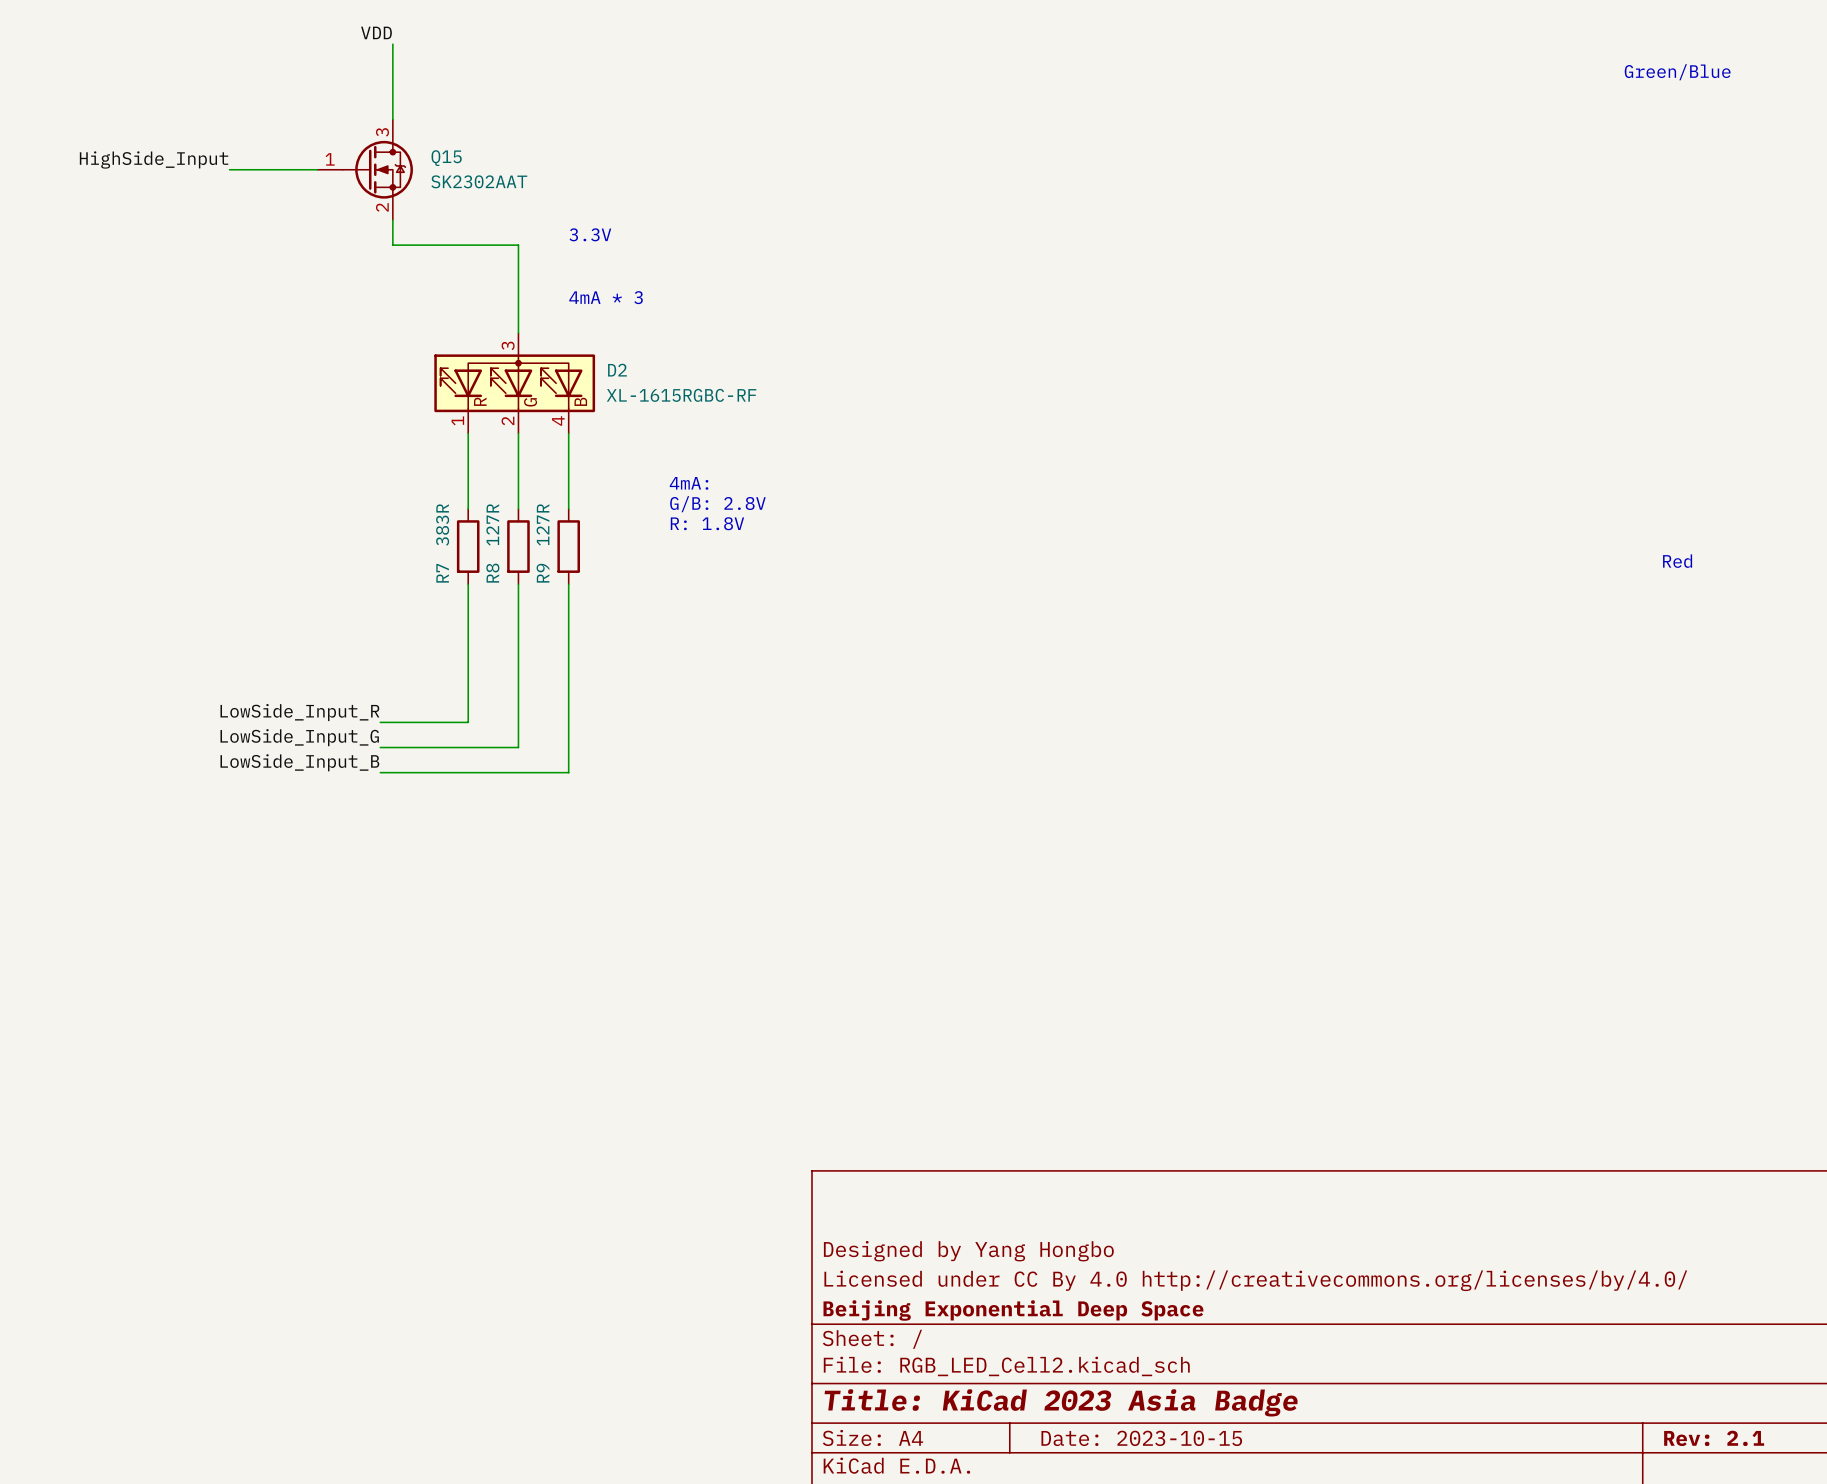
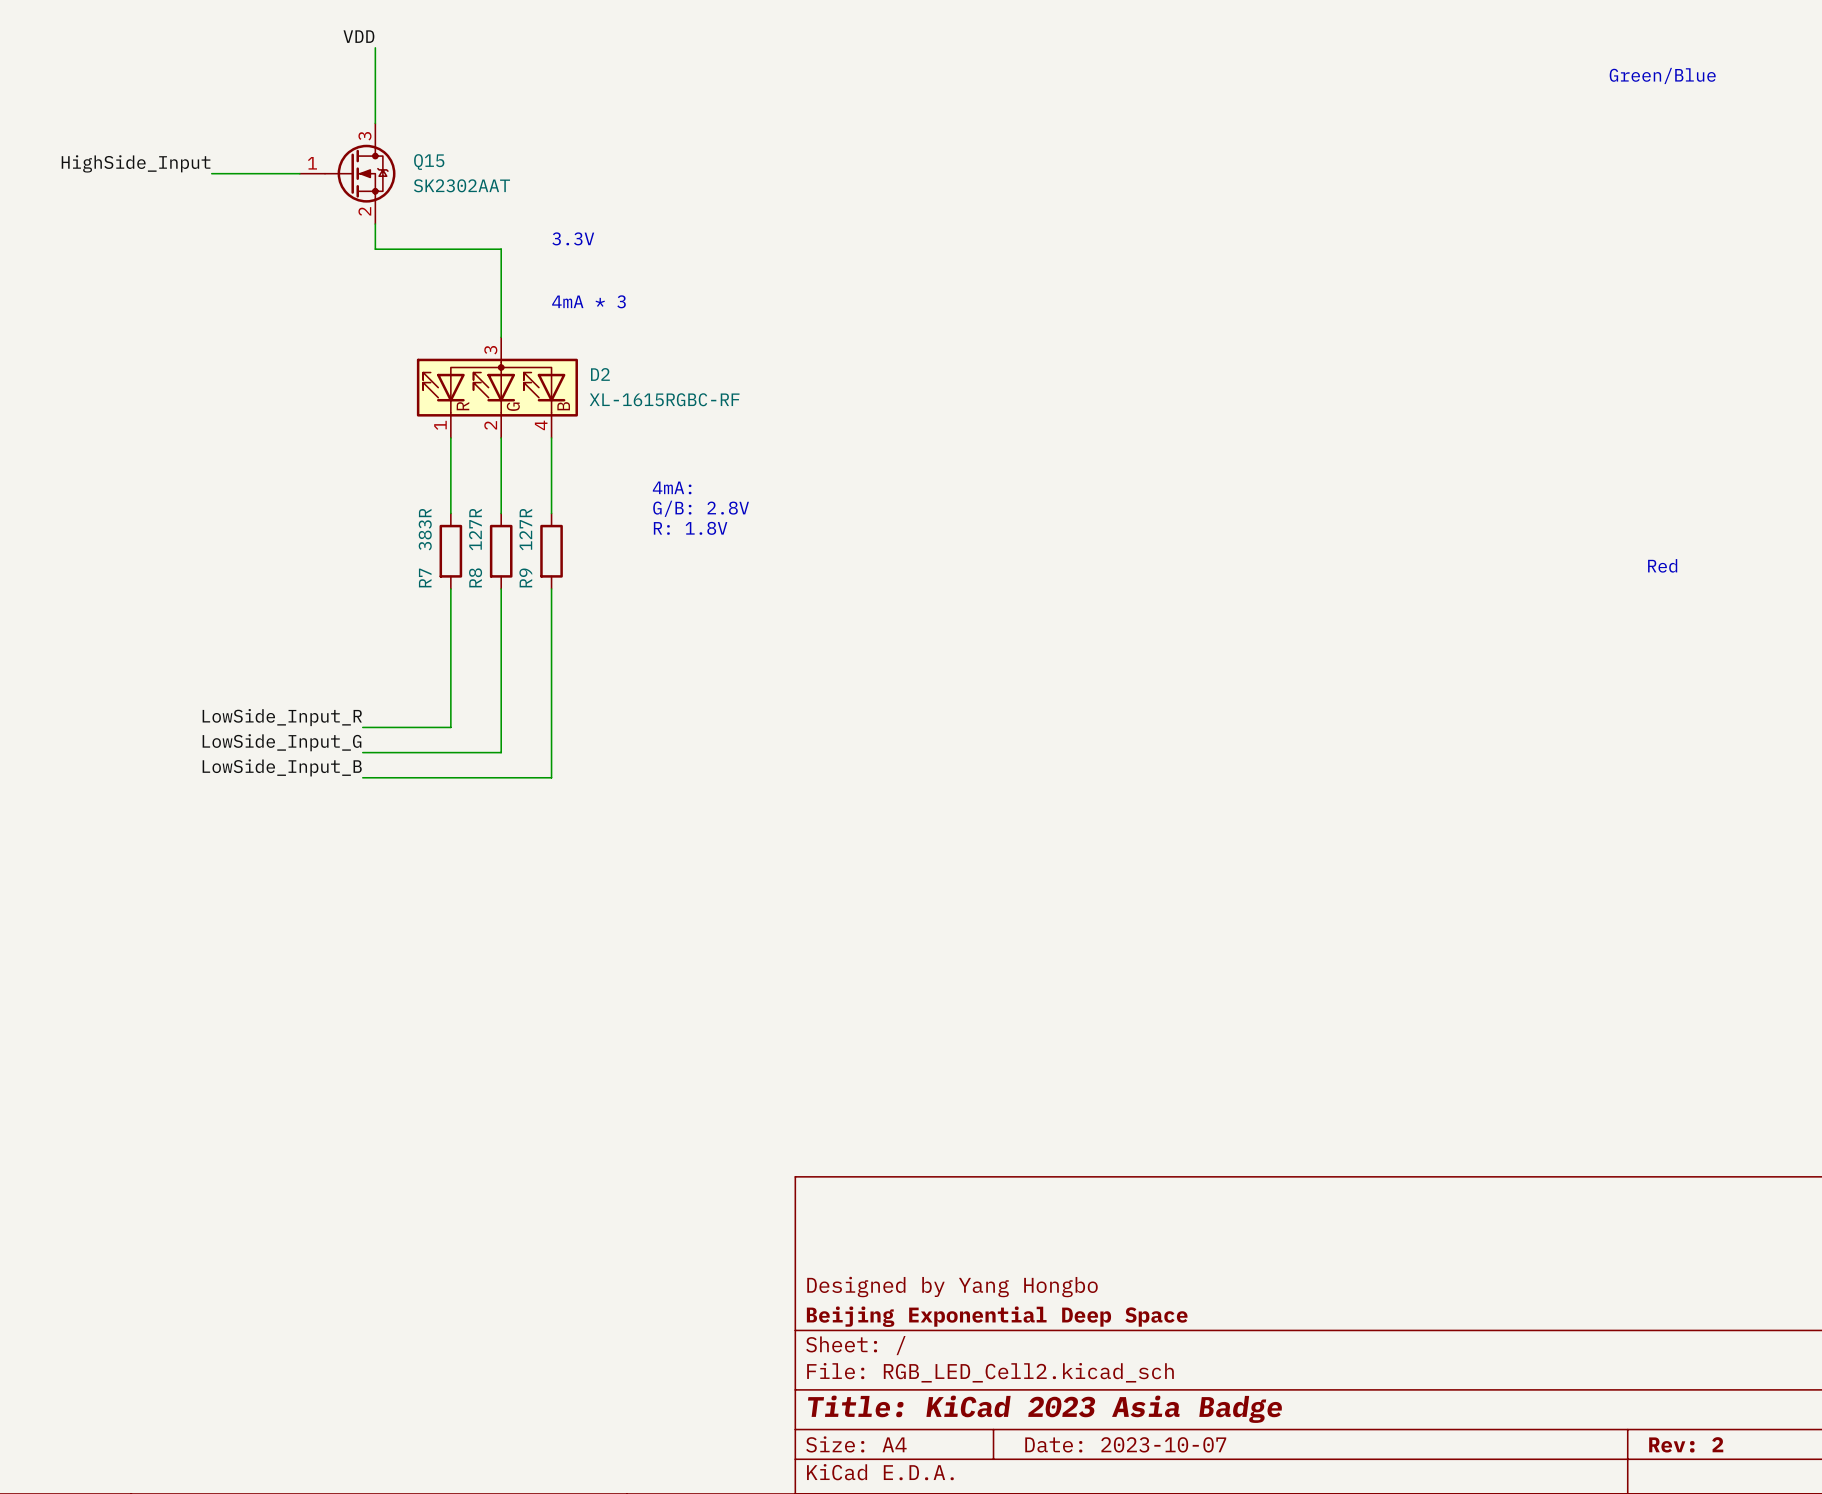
title block: Designed by Yang Hongbo (968, 1251) -> none
title block: Licensed under CC By 4.0 http://creativecommons.org/licenses/by/4.0/ (1255, 1280) -> Designed by Yang Hongbo (952, 1287)
title block: Date: 2023-10-15 (1141, 1438) -> Date: 2023-10-07 (1125, 1444)
title block: Rev: 2.1 (1714, 1438) -> Rev: 2 (1686, 1444)

